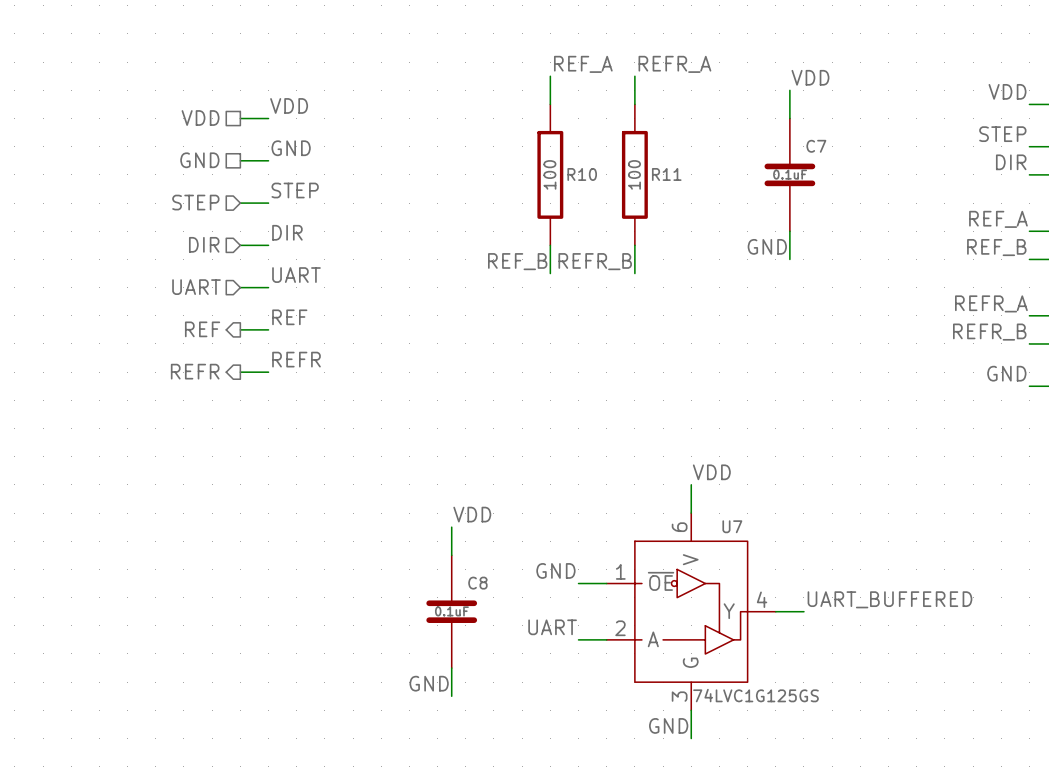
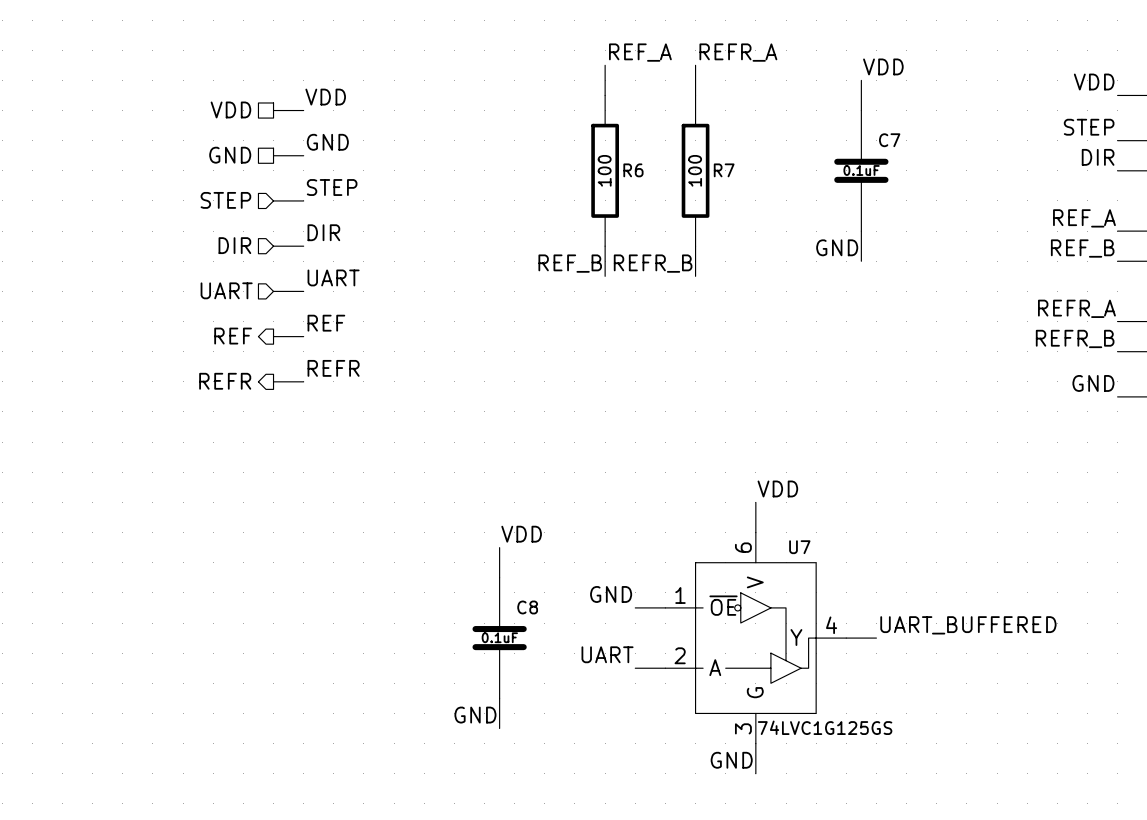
R10 name: R10 (582, 174) -> R6 (633, 170)
R11 name: R11 (666, 174) -> R7 (724, 170)

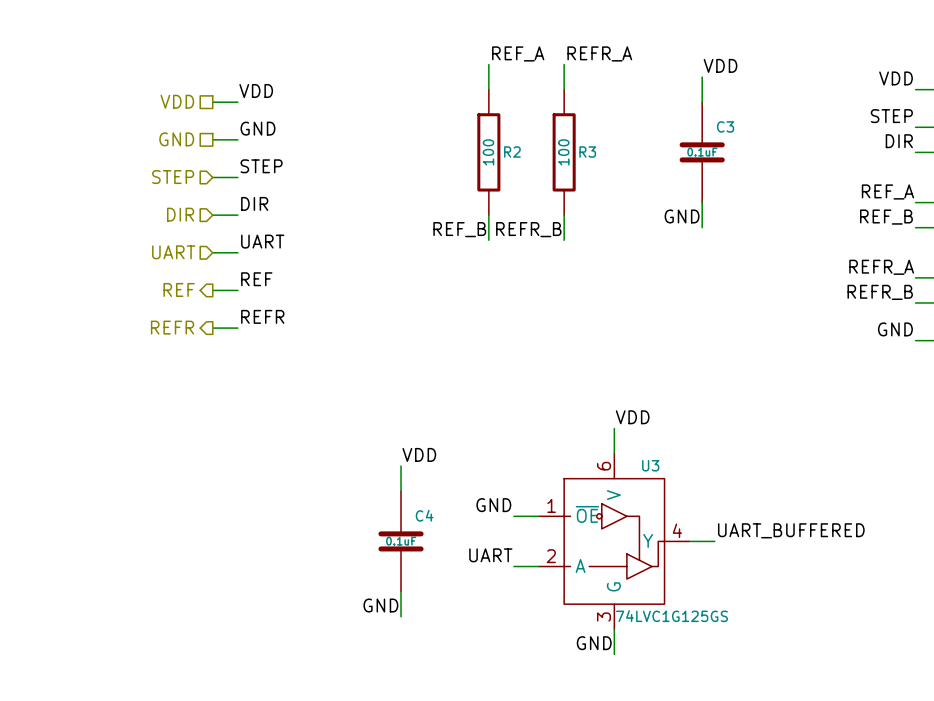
C7 name: C7 (889, 140) -> C3 (725, 126)
R6 name: R6 (633, 170) -> R2 (512, 152)
R7 name: R7 (724, 170) -> R3 (587, 152)
U7 name: U7 (799, 547) -> U3 (650, 465)
C8 name: C8 (527, 607) -> C4 (424, 515)

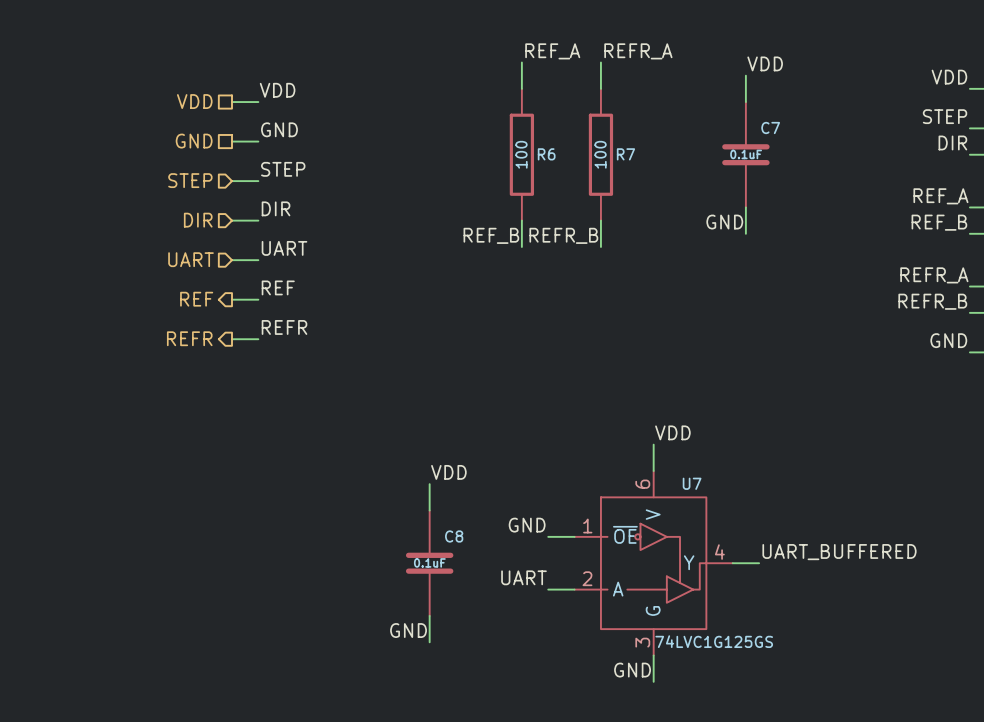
C3 name: C3 (725, 126) -> C7 (770, 127)
R2 name: R2 (512, 152) -> R6 (546, 154)
R3 name: R3 (587, 152) -> R7 (625, 154)
U3 name: U3 (650, 465) -> U7 (692, 483)
C4 name: C4 (424, 515) -> C8 (454, 536)

